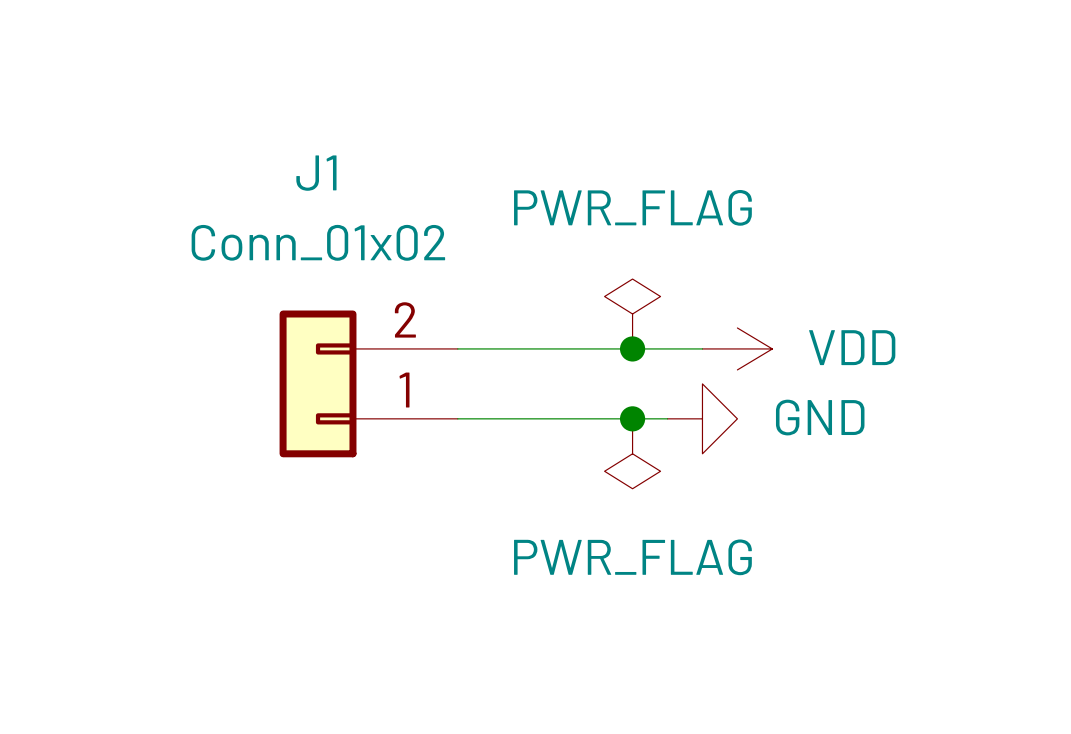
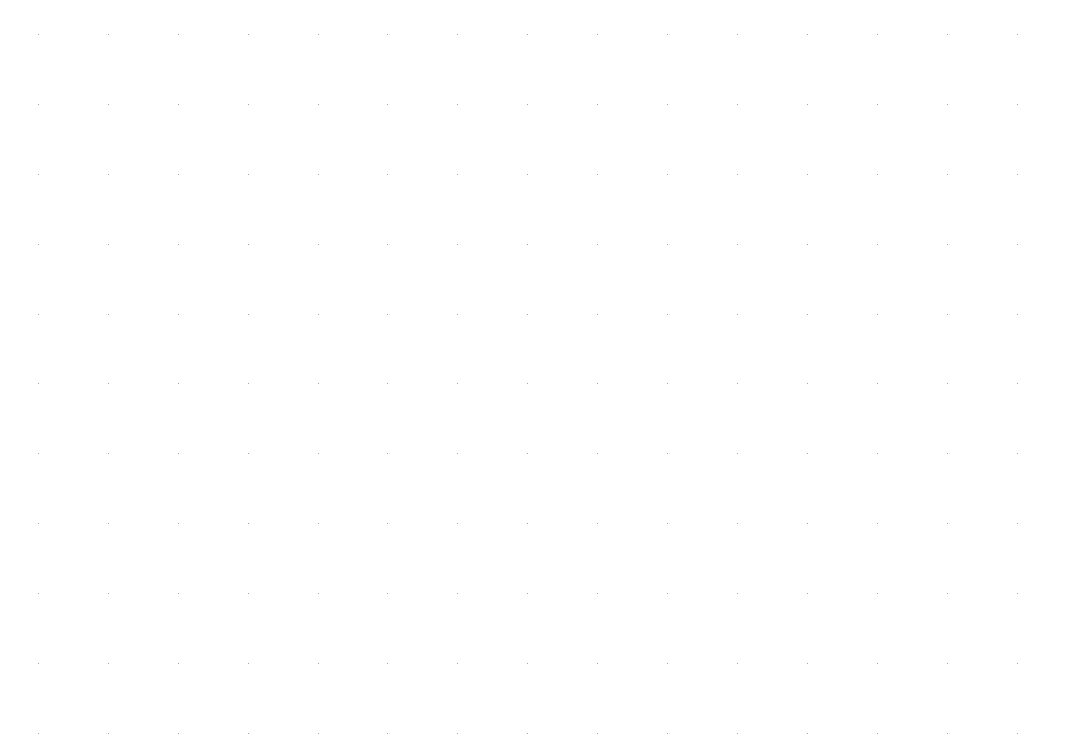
power symbol: PWR_FLAG (632, 314) -> none
wire: (457, 348) (702, 348) -> none
junction: (632, 348) -> none
power symbol: VDD (737, 348) -> none
J1: Conn_01x02 (368, 383) -> none
wire: (457, 418) (667, 418) -> none
junction: (632, 418) -> none
power symbol: GND (702, 418) -> none
power symbol: PWR_FLAG (632, 453) -> none

